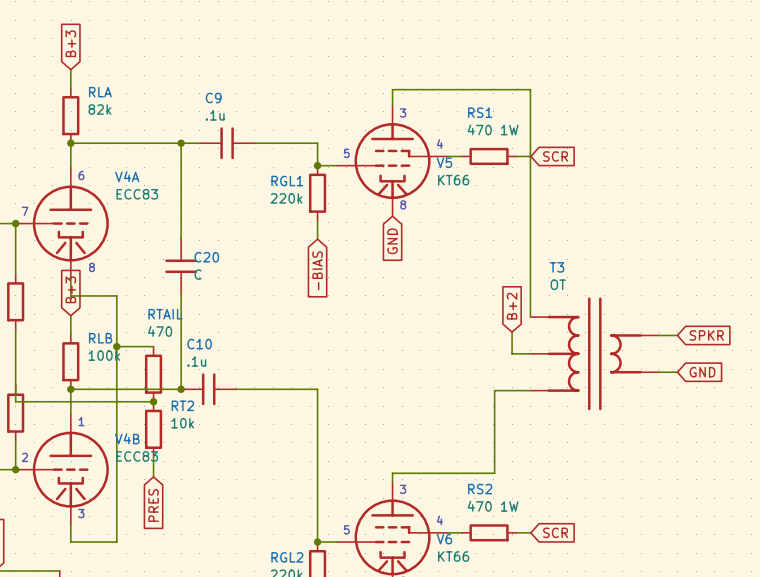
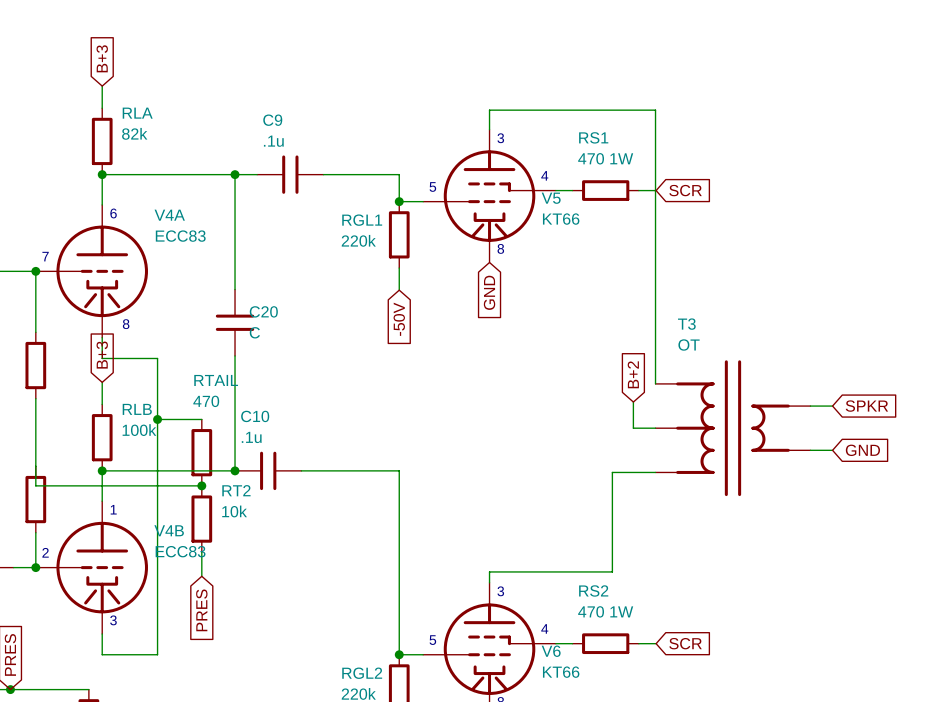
global label: -BIAS (317, 270) -> -50V (399, 319)

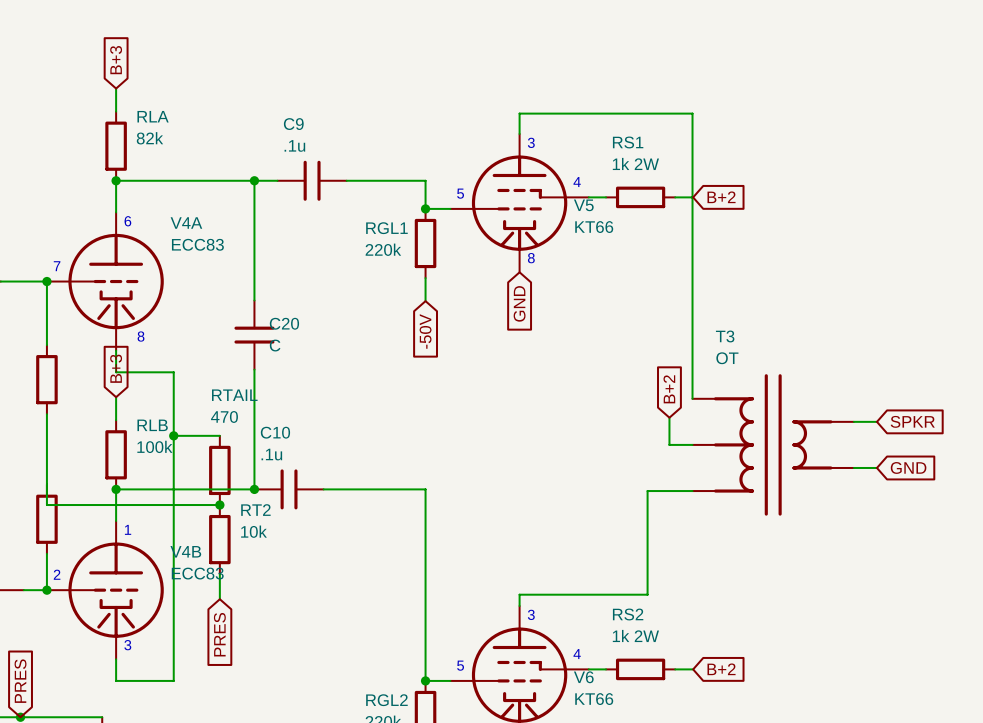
RS1 value: 470 1W (605, 158) -> 1k 2W (635, 163)
global label: SCR (685, 190) -> B+2 (721, 197)
RS2 value: 470 1W (605, 611) -> 1k 2W (635, 635)
global label: SCR (685, 643) -> B+2 (721, 669)

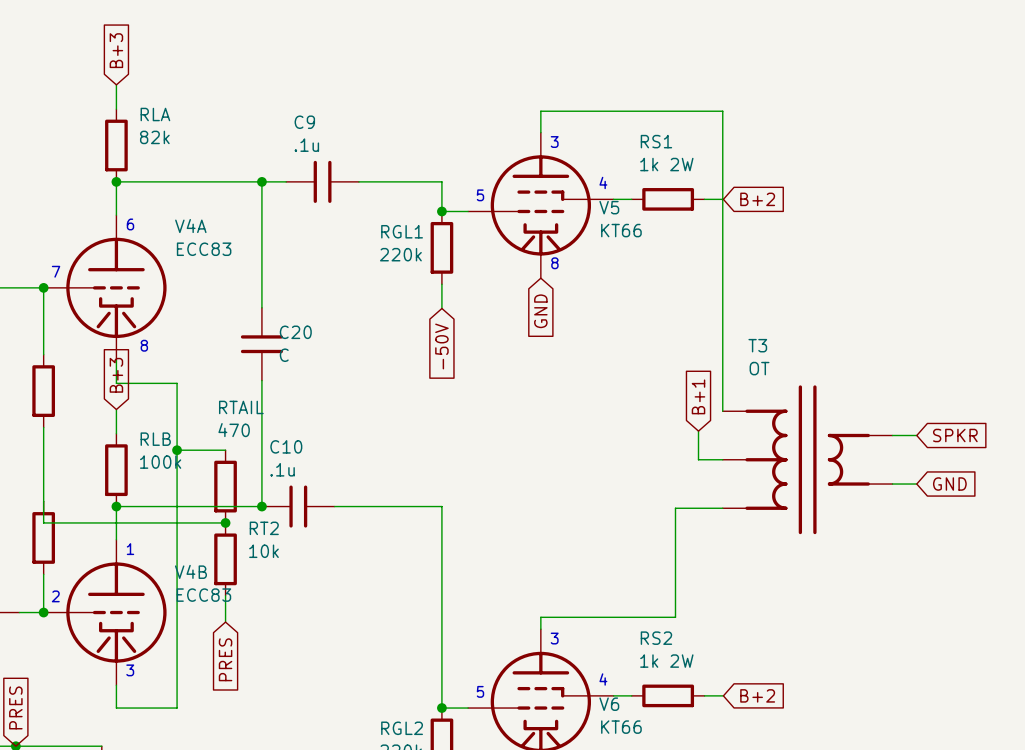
global label: B+2 (669, 389) -> B+1 (698, 396)

